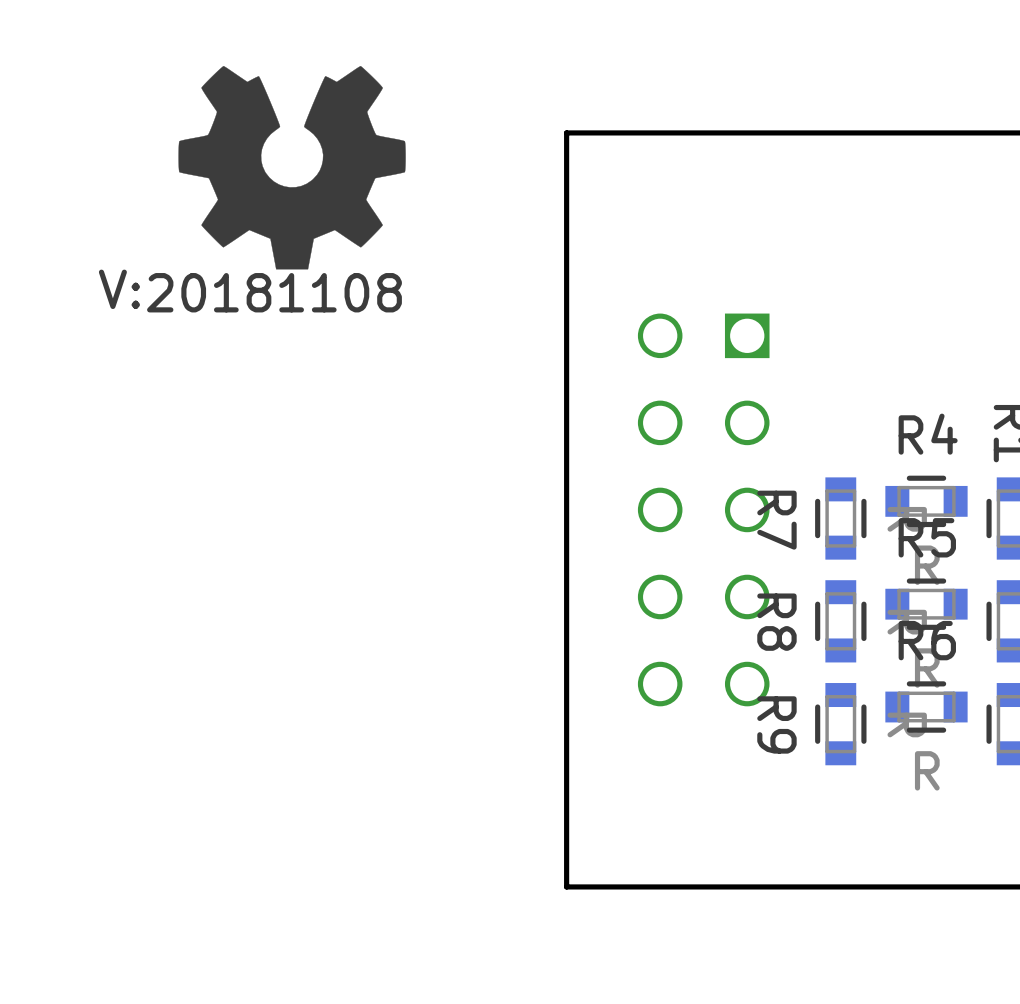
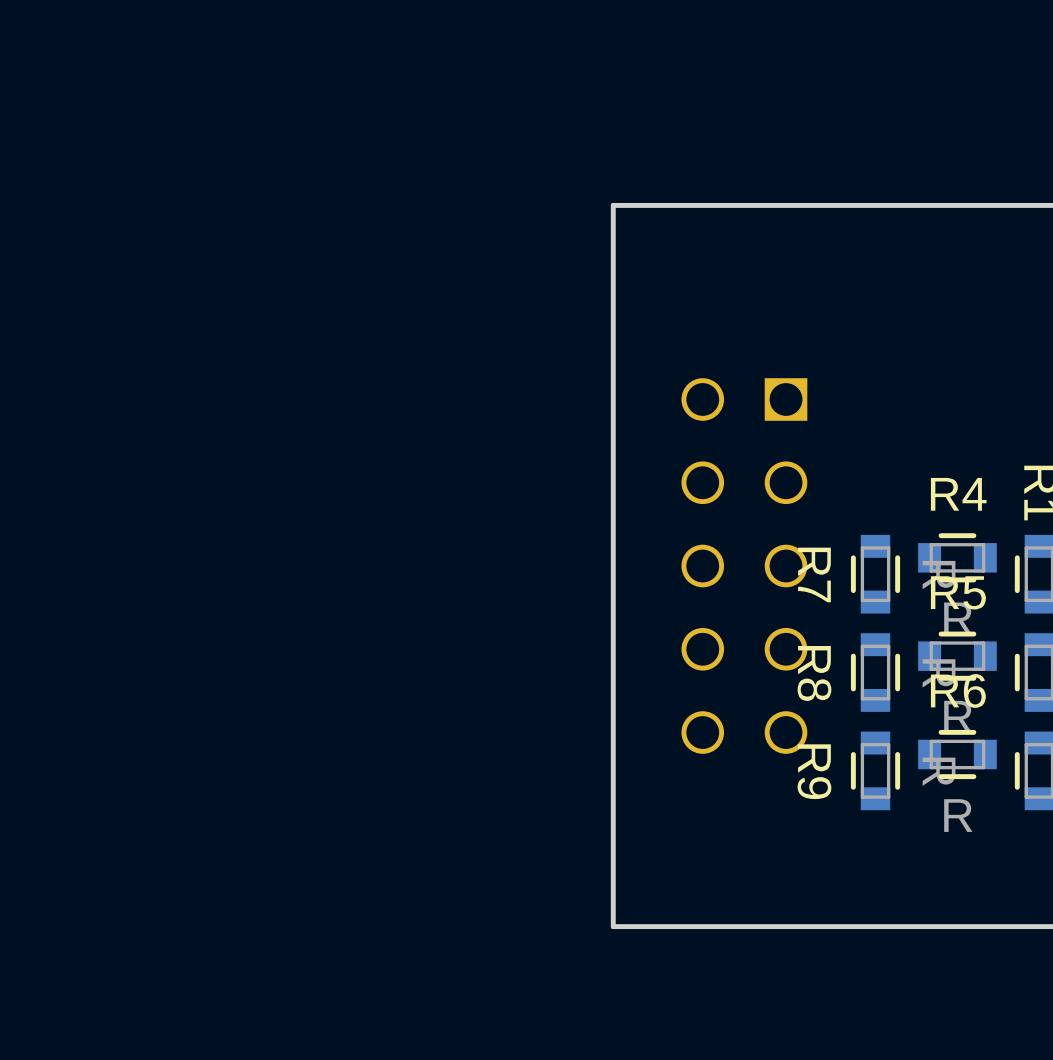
drawing: [178, 66, 406, 270] -> none

